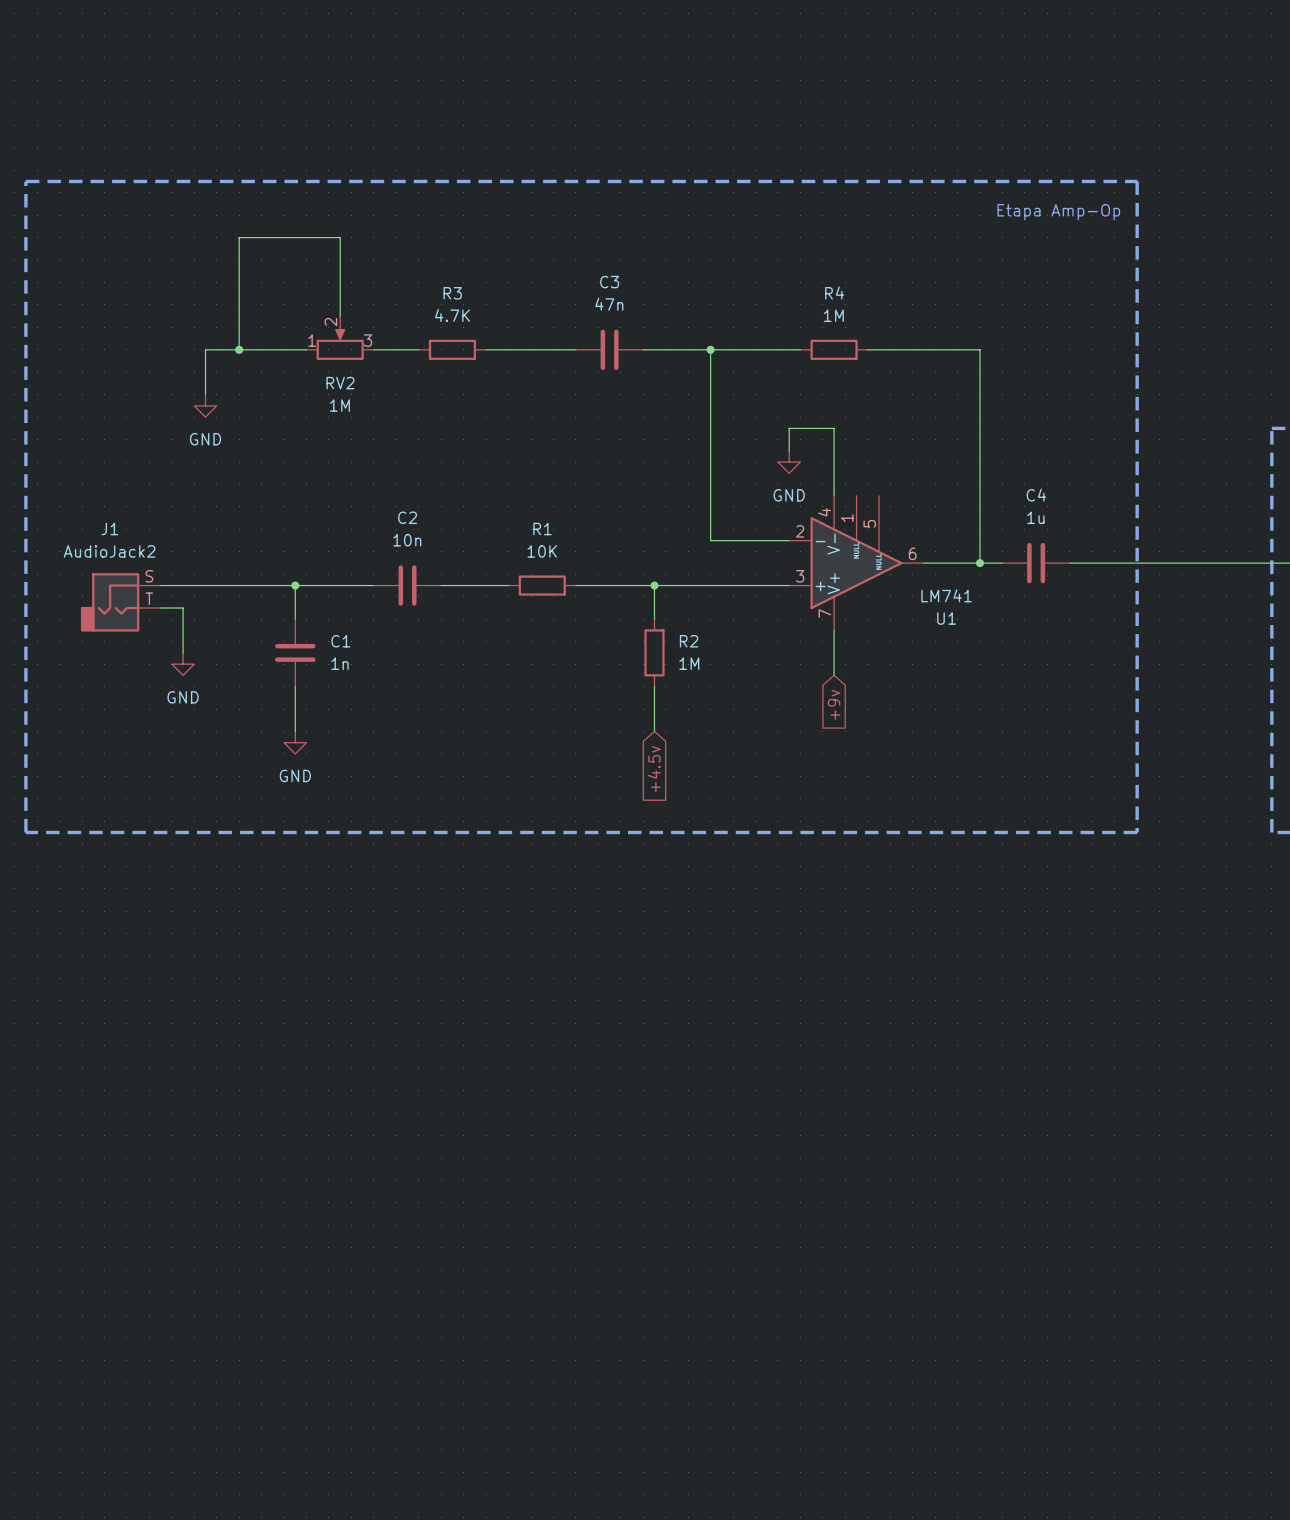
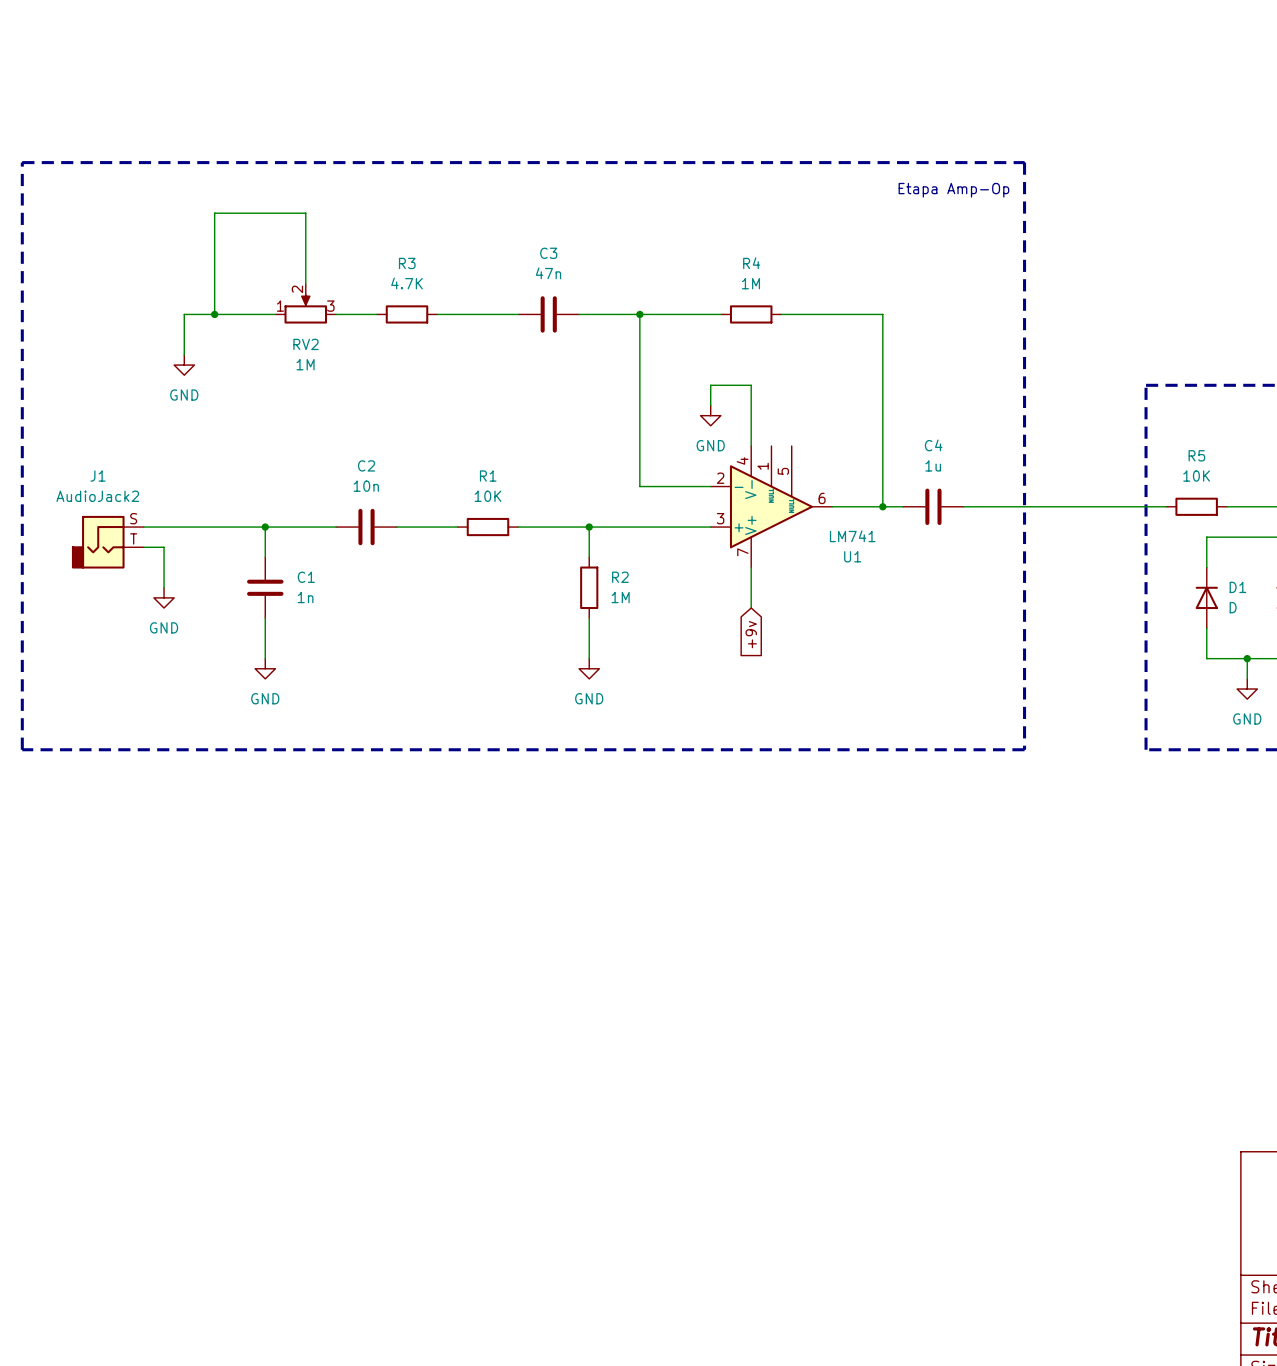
power symbol: none -> GND (589, 668)
global label: +4.5v (654, 769) -> none

